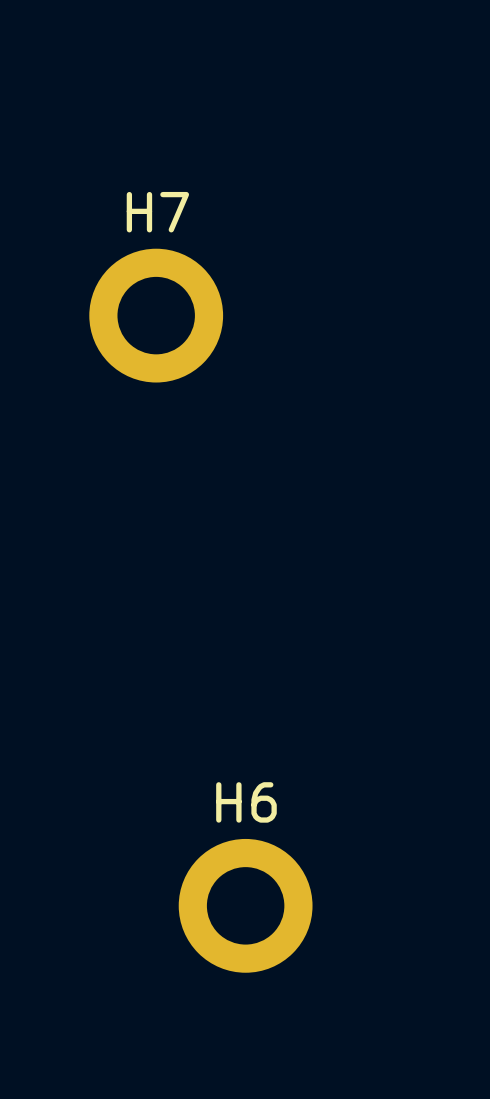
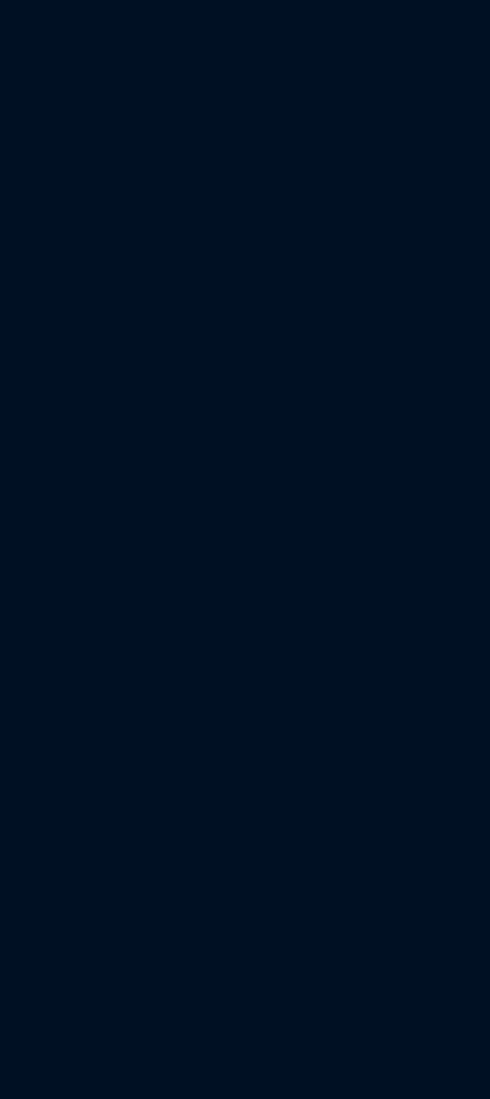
H7: (156, 315) -> none
H6: (245, 905) -> none

